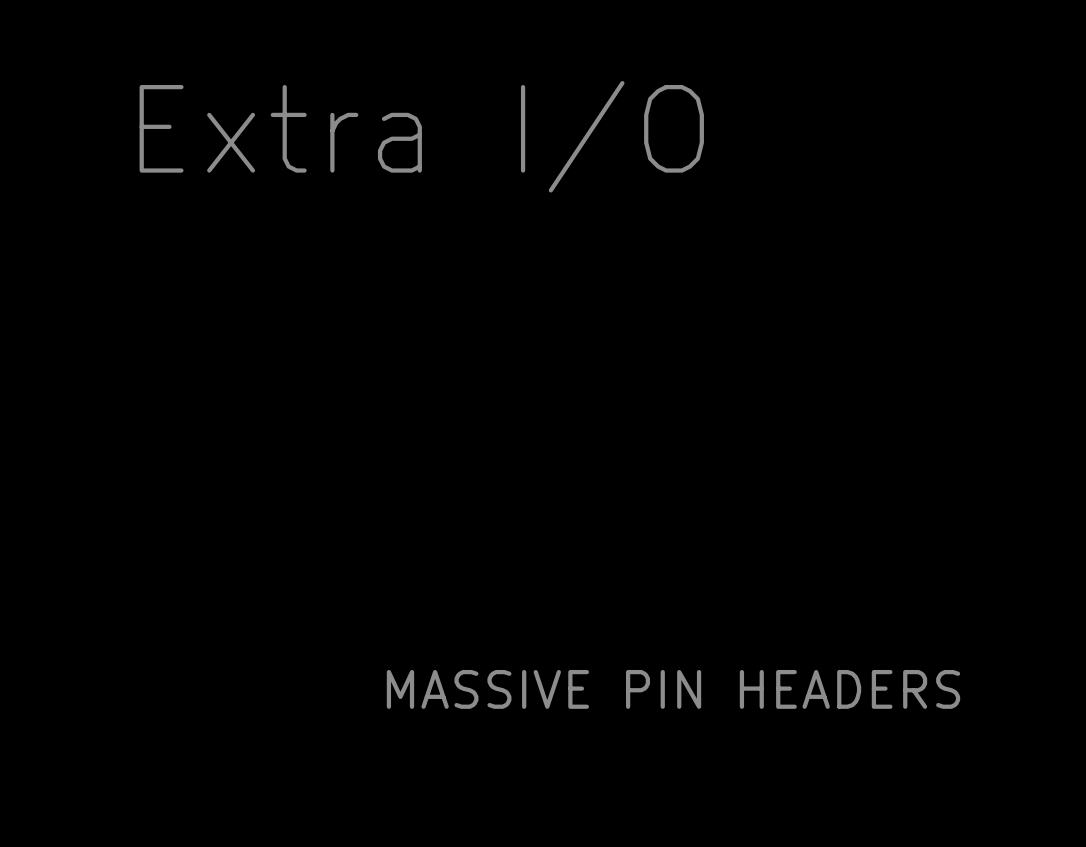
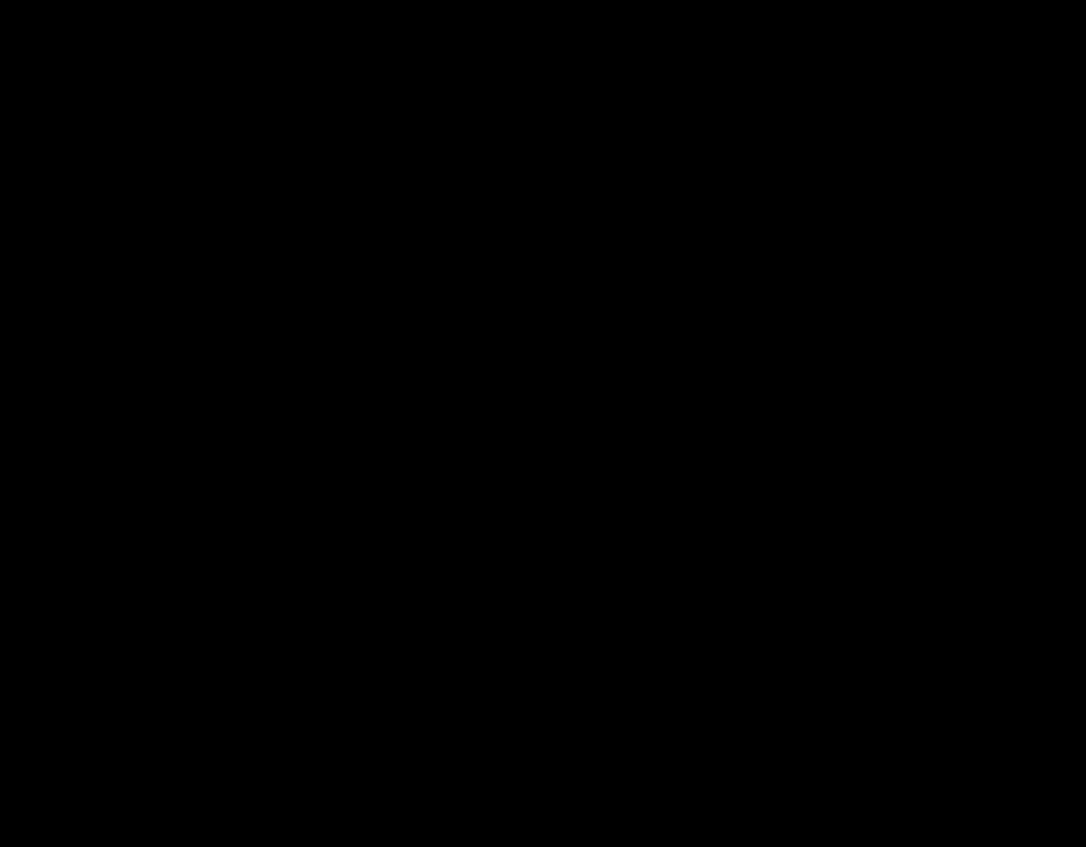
text: Extra I/O (421, 136) -> none
text: MASSIVE PIN HEADERS (673, 689) -> none

